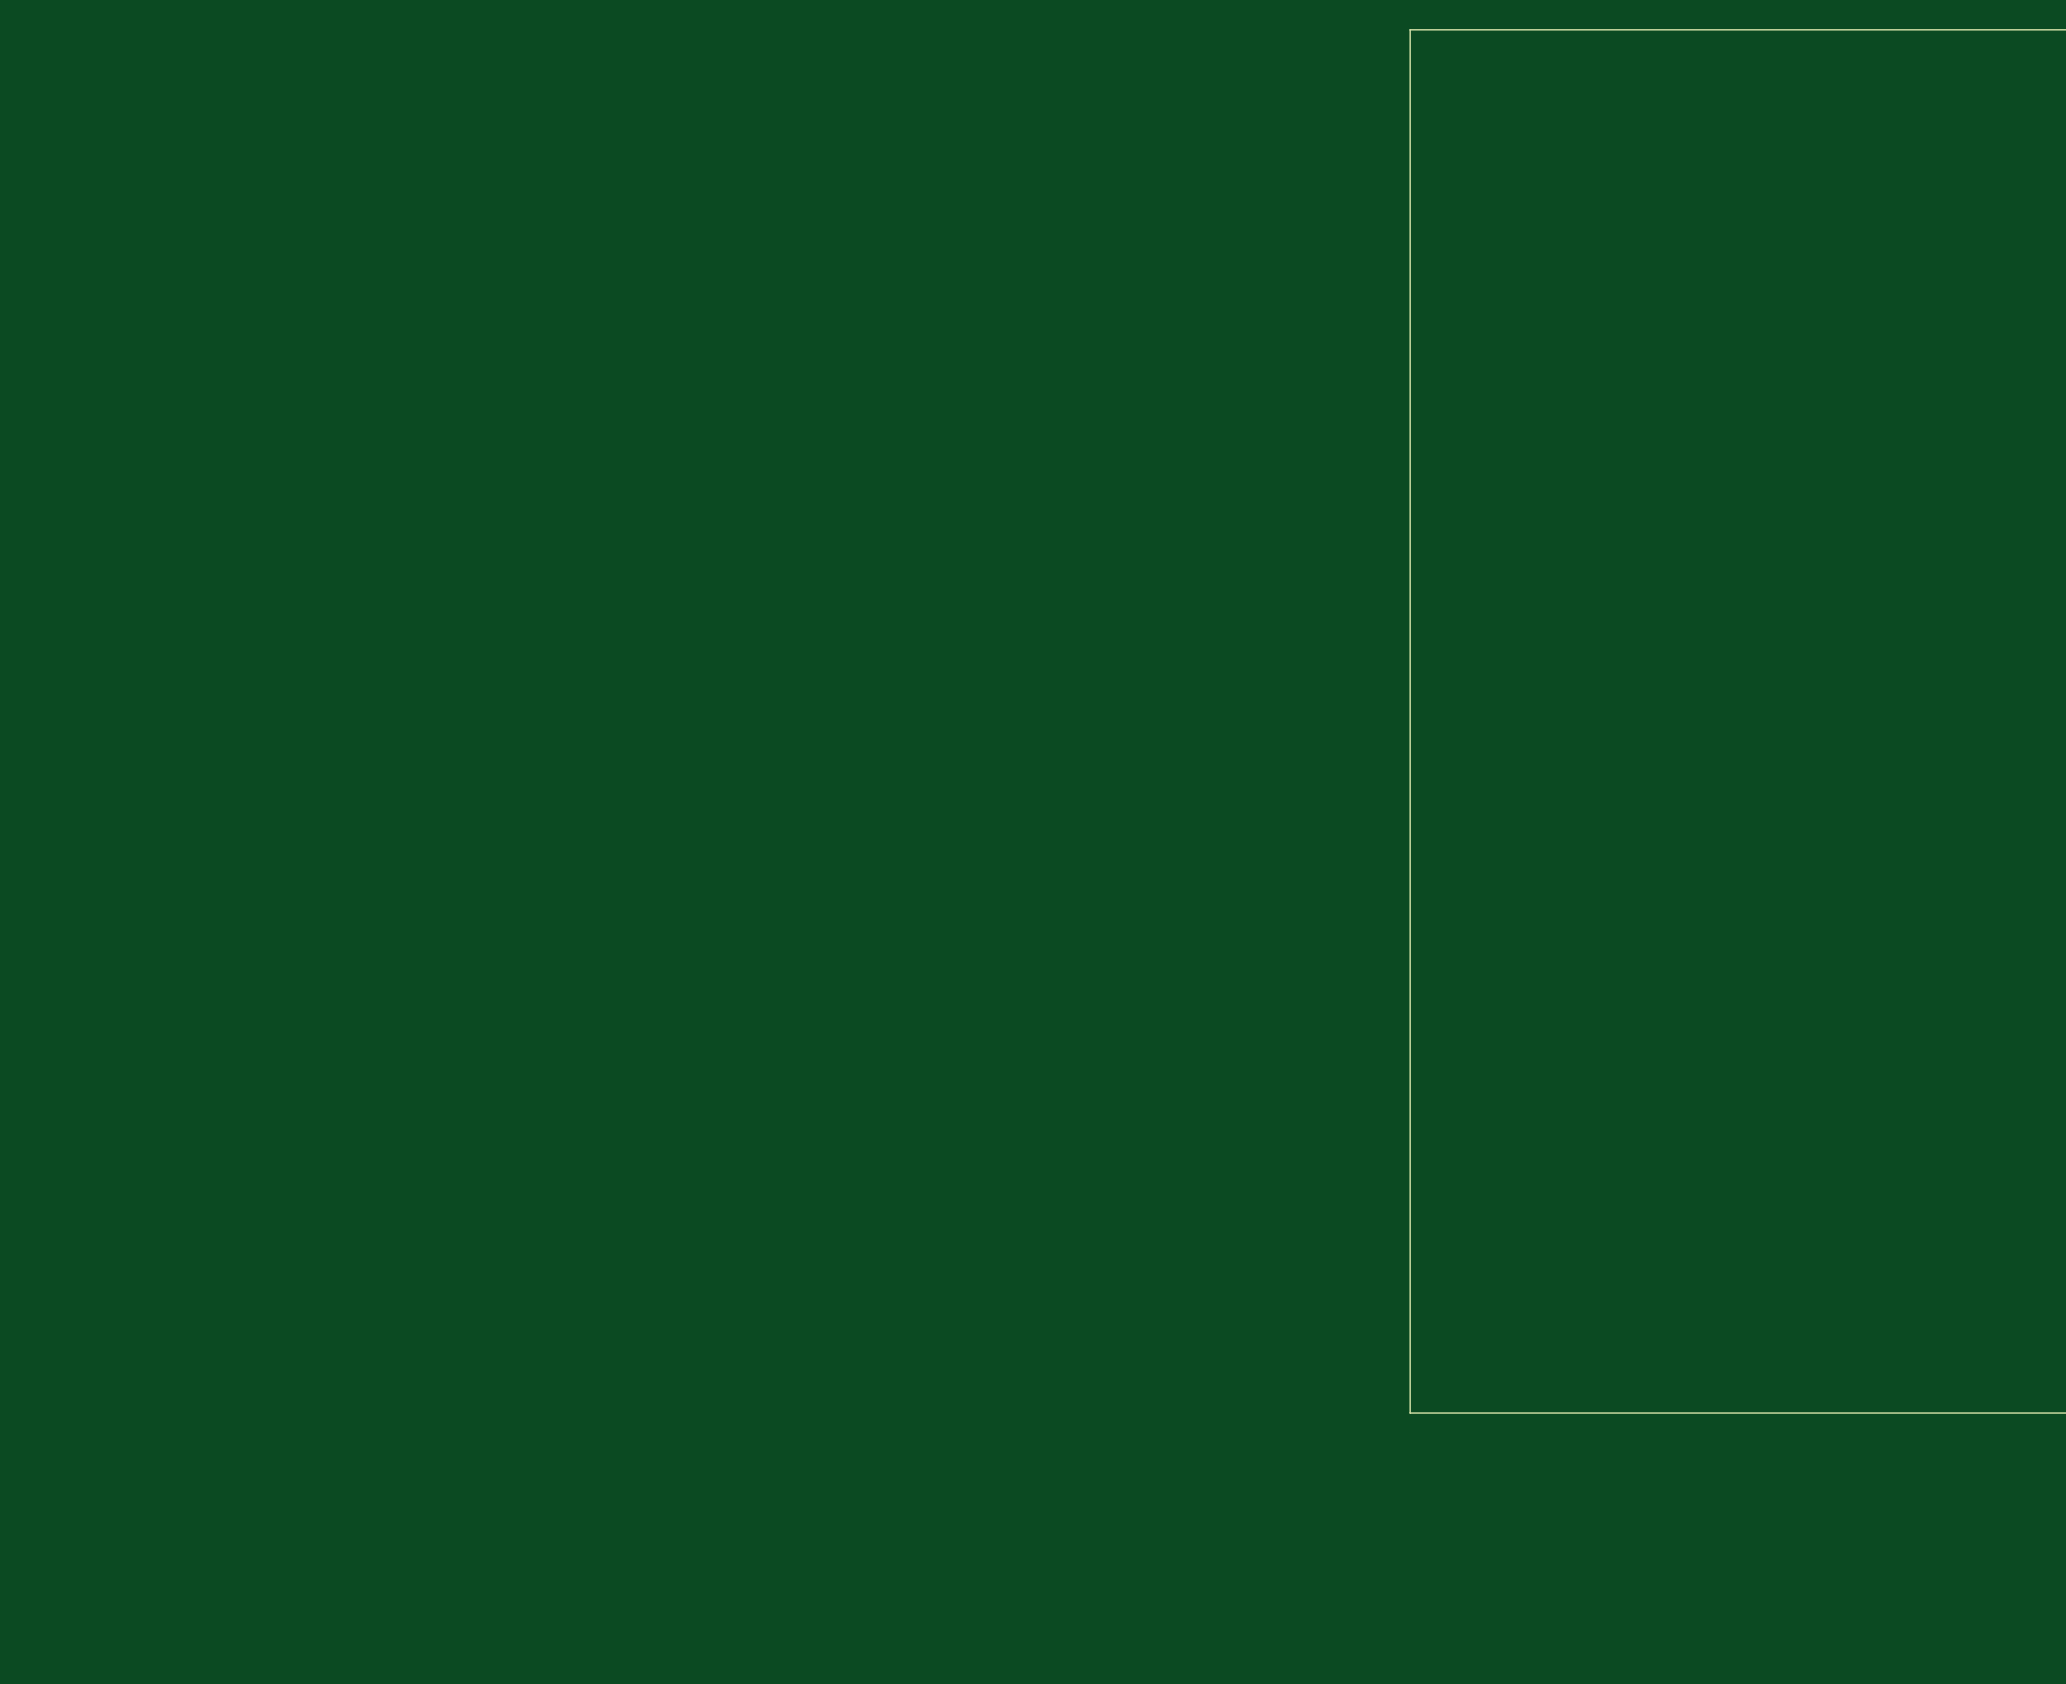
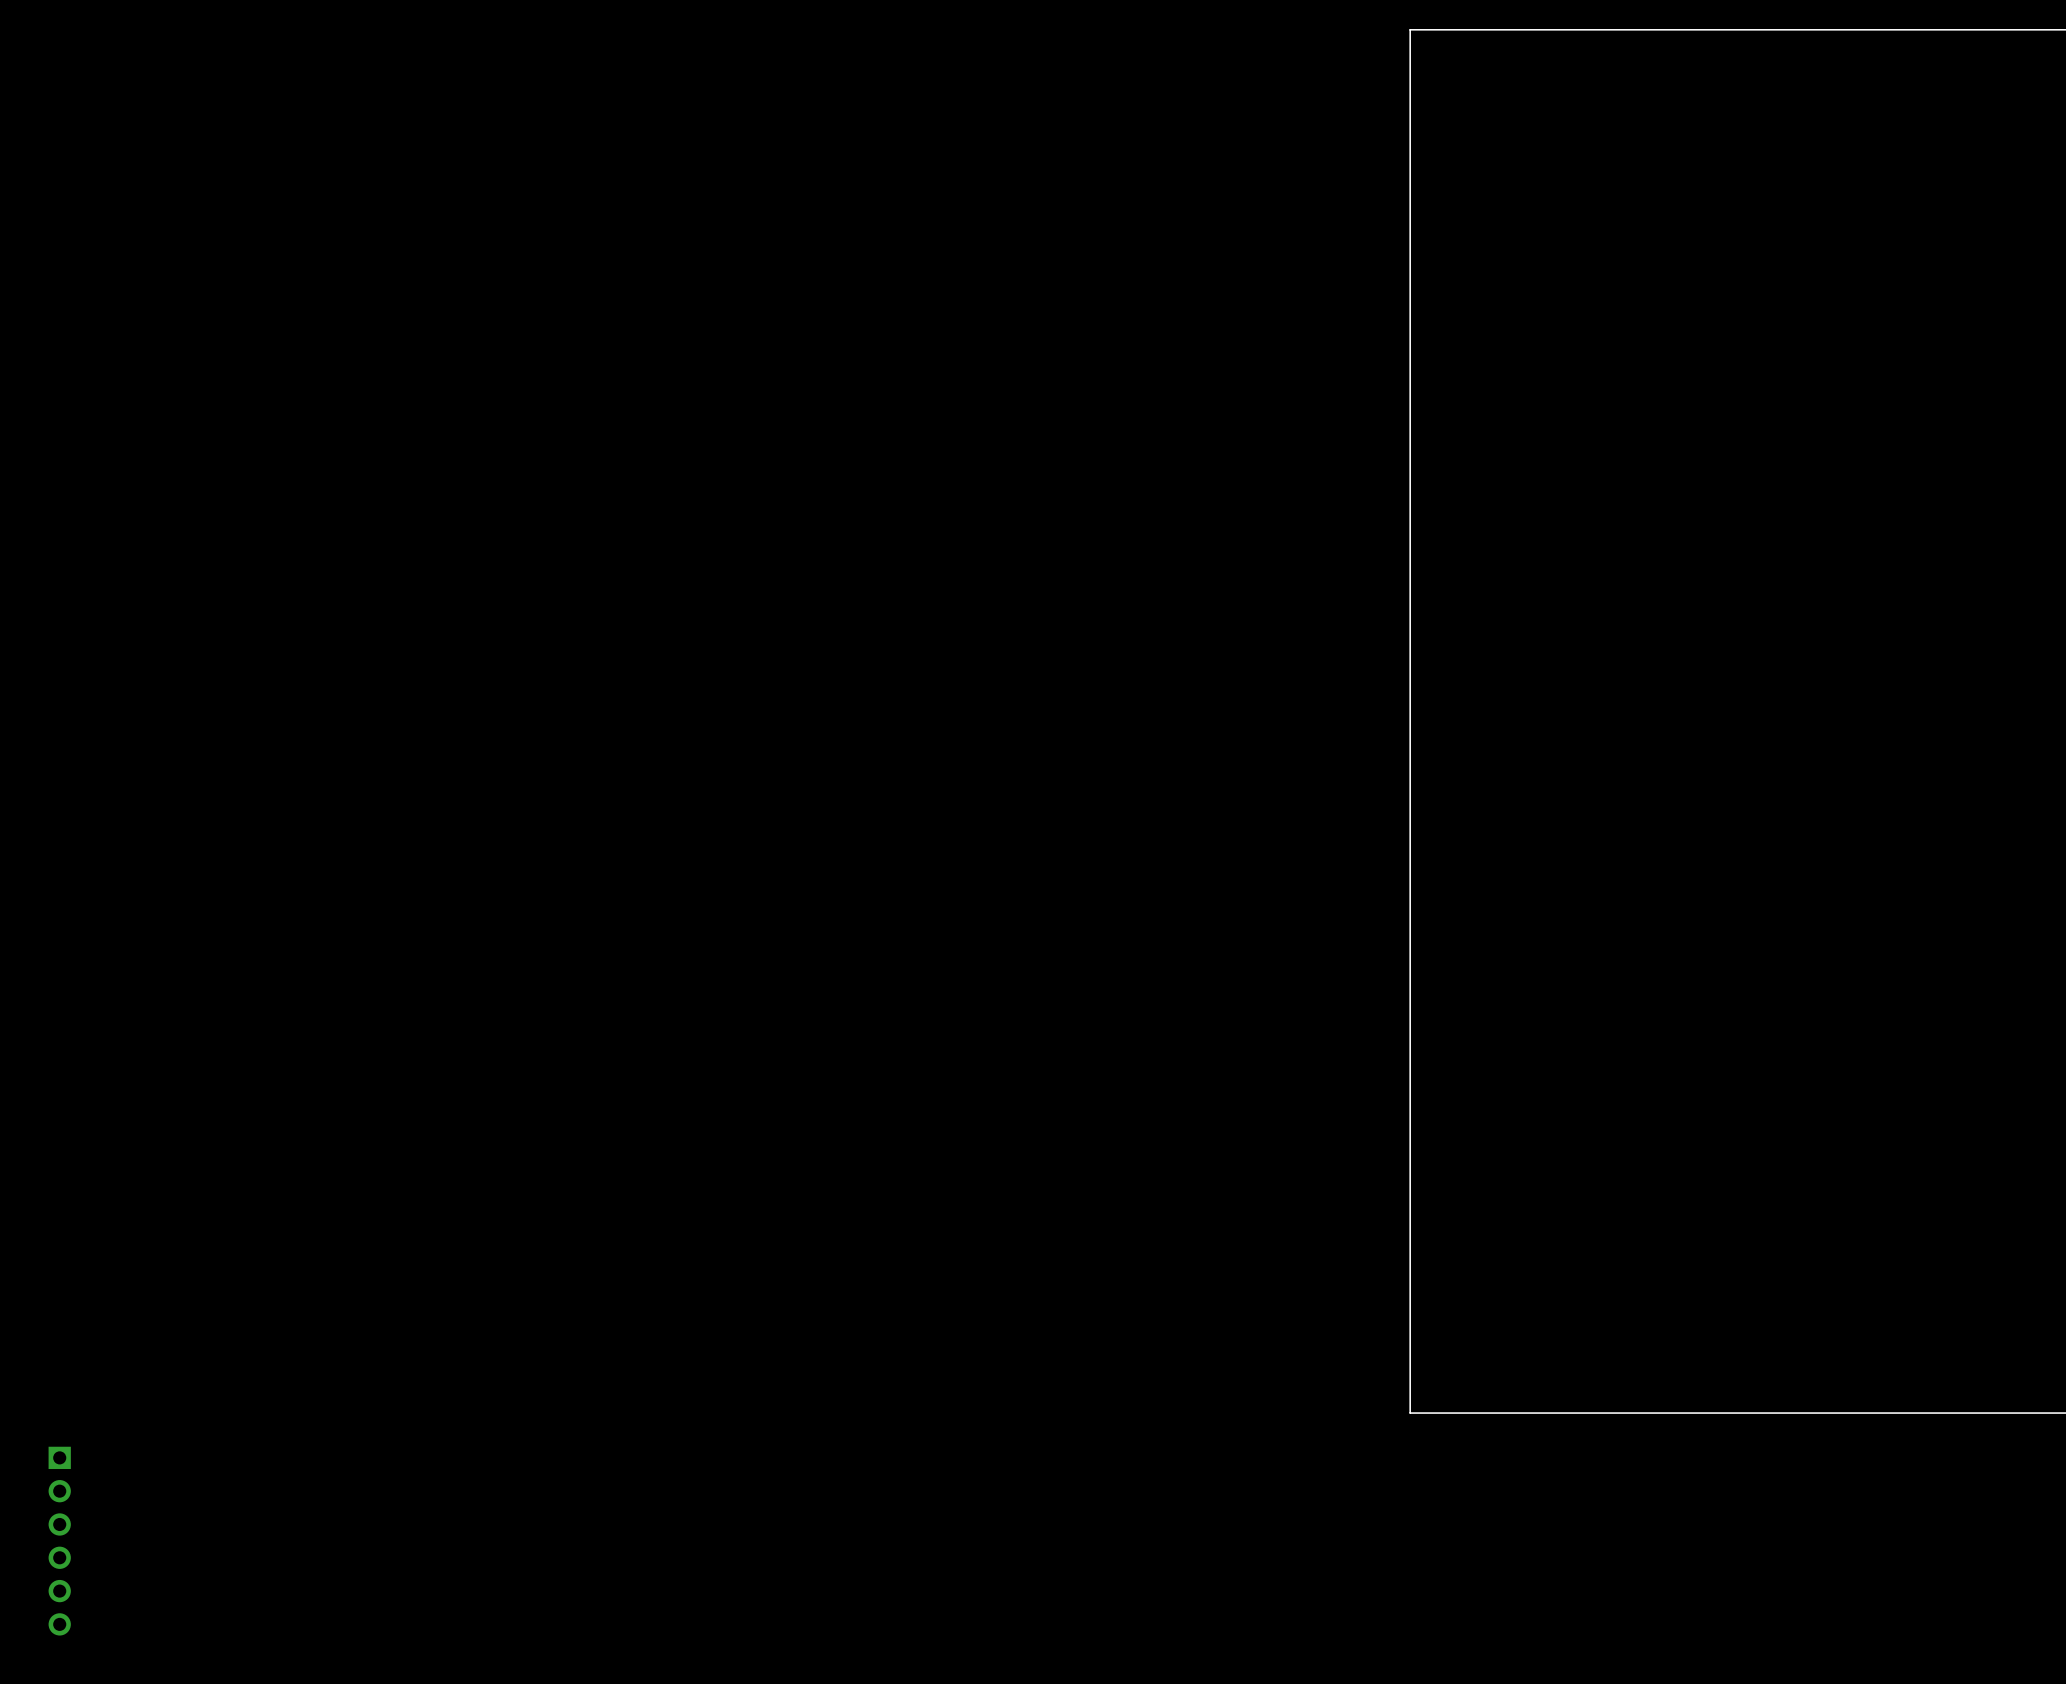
part: none -> (59, 1541)

